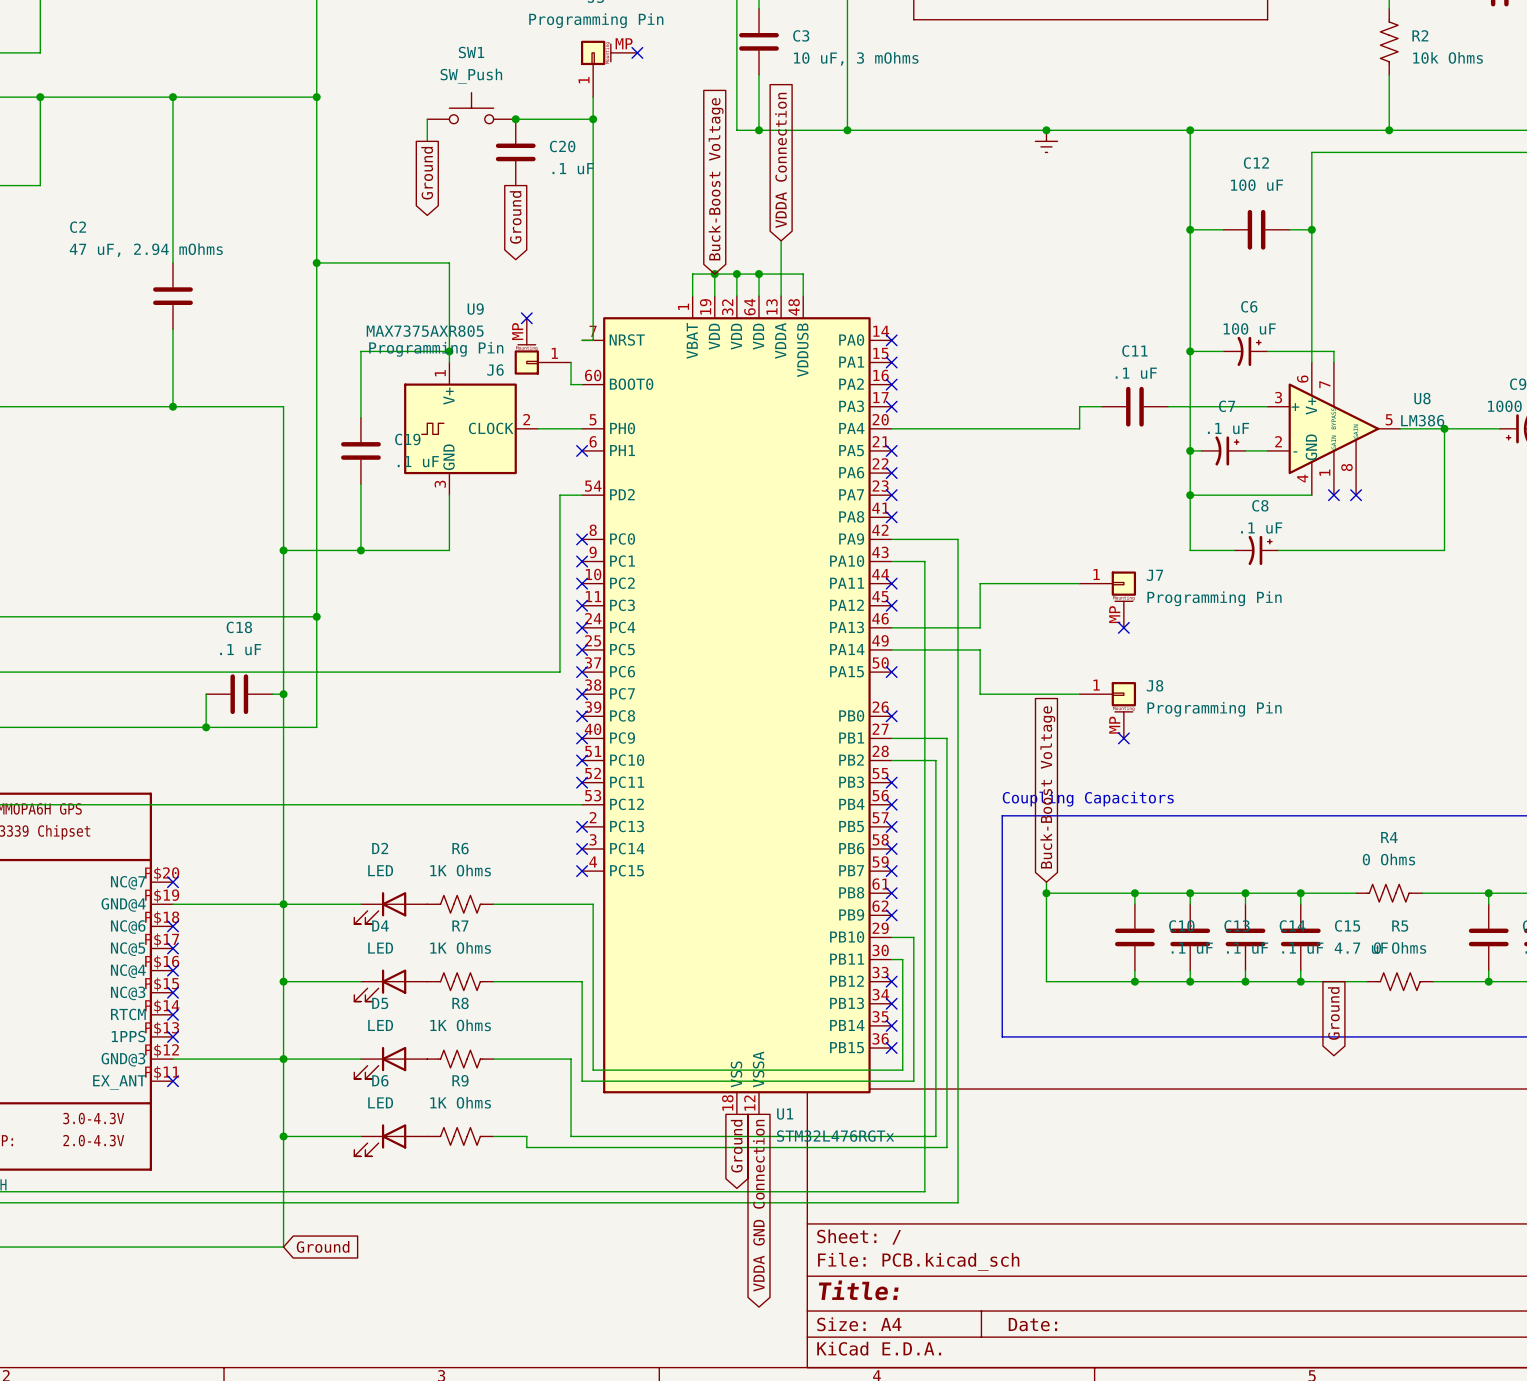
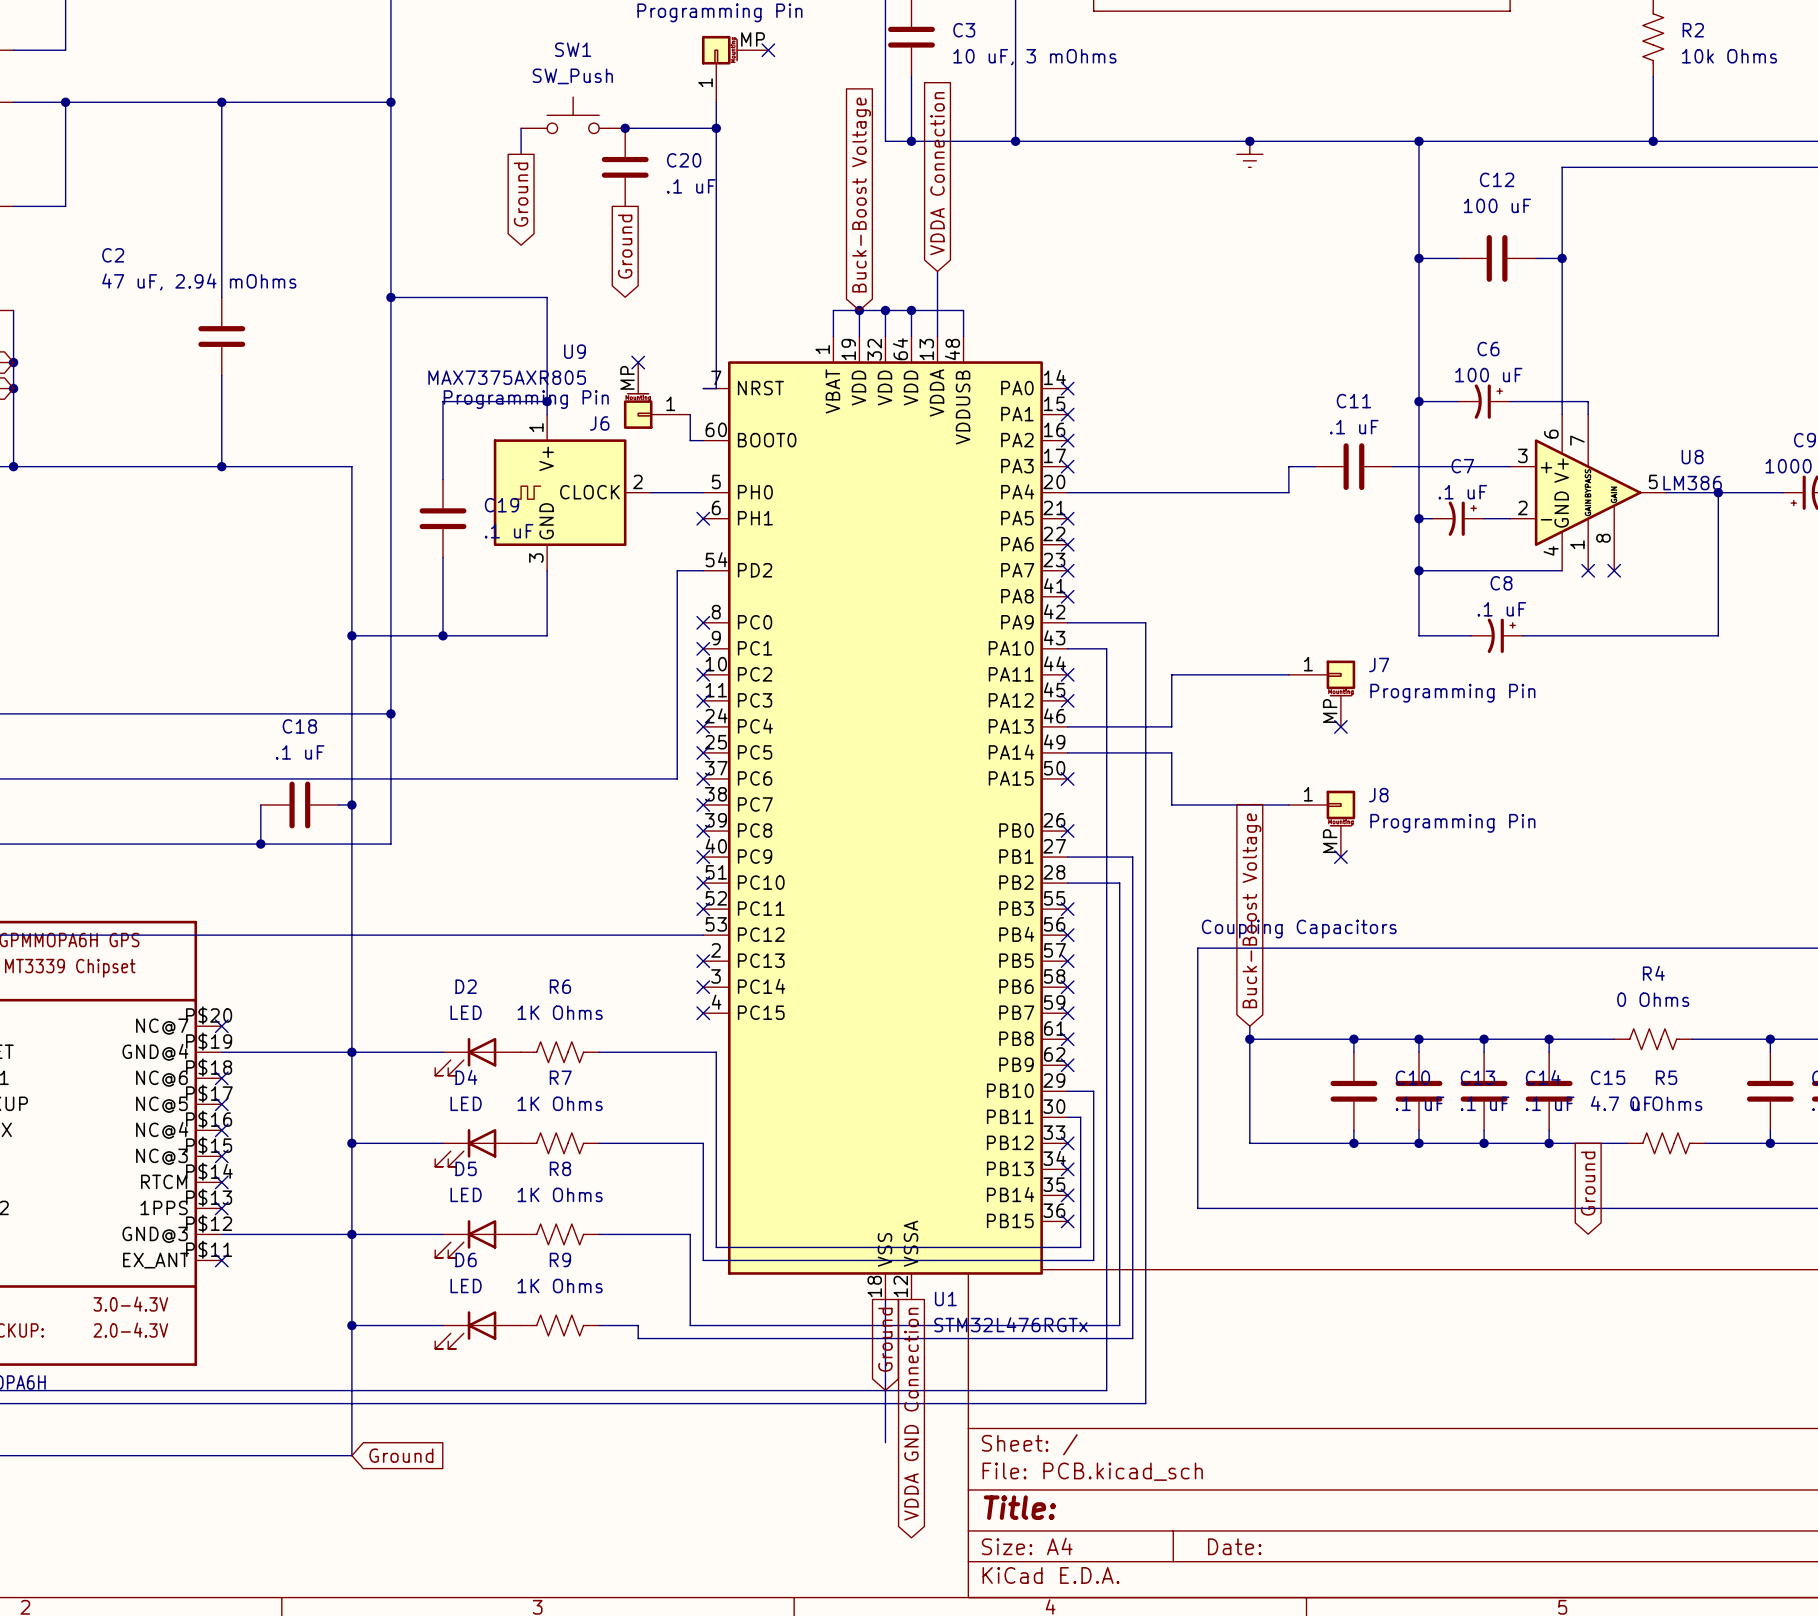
wire: none -> (885, 1299) (885, 1442)

